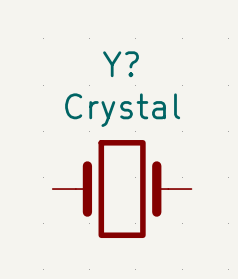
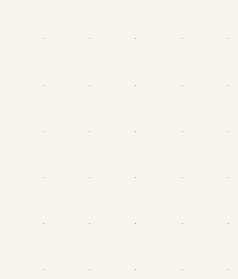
Y?: Crystal (122, 189) -> none

